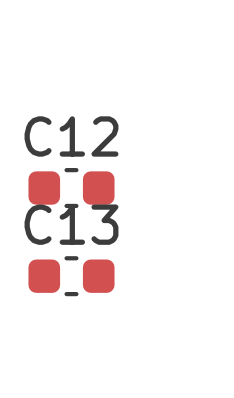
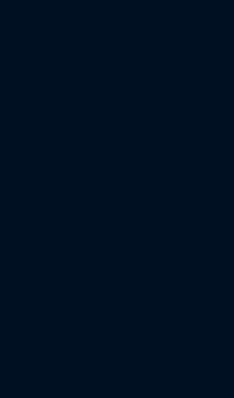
C12: (71, 188) -> none
C13: (71, 276) -> none

